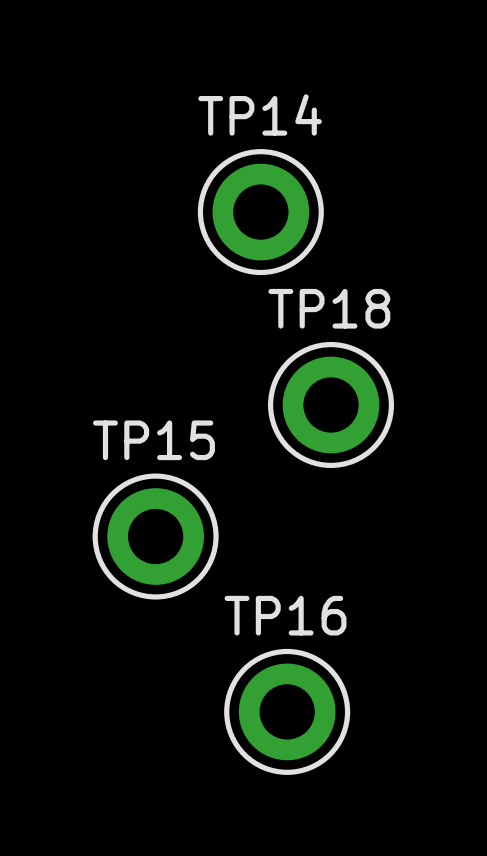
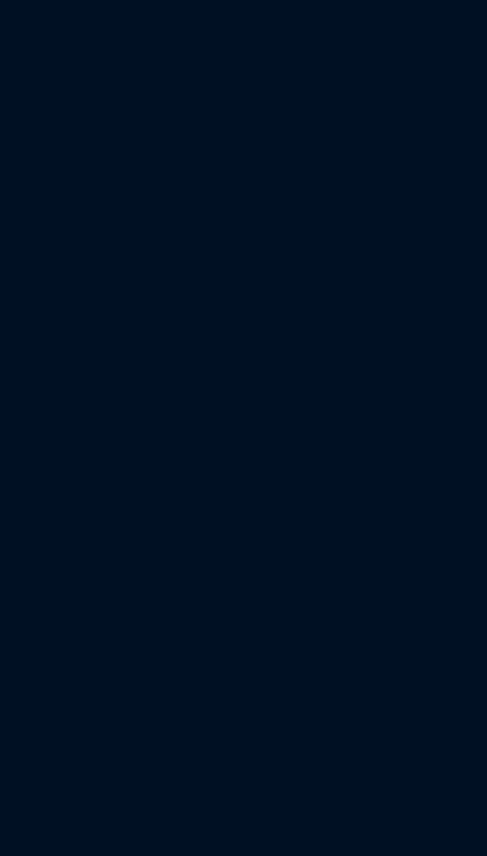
TP14: (260, 212) -> none
TP18: (331, 404) -> none
TP15: (155, 536) -> none
TP16: (287, 711) -> none

